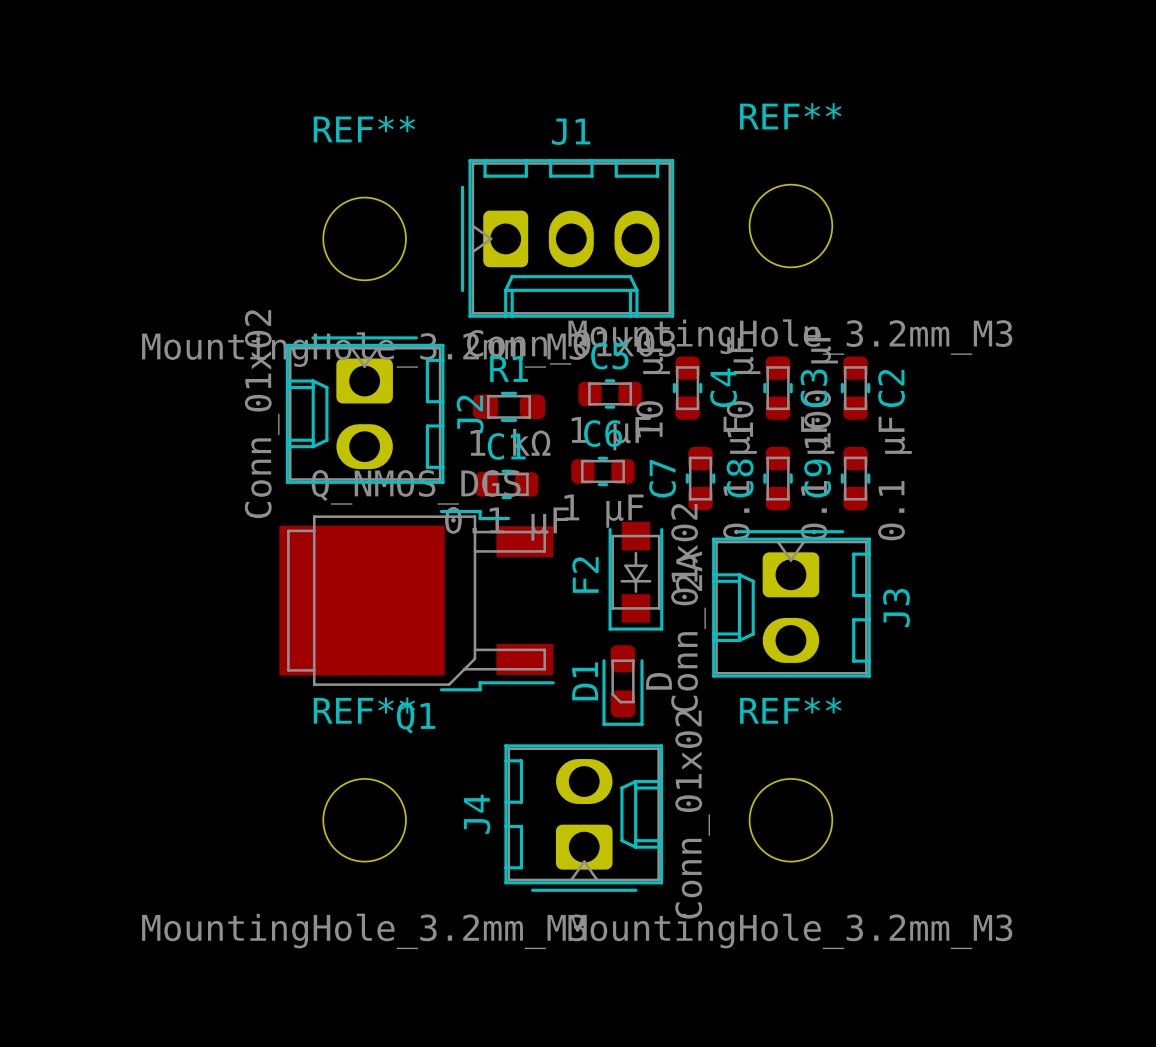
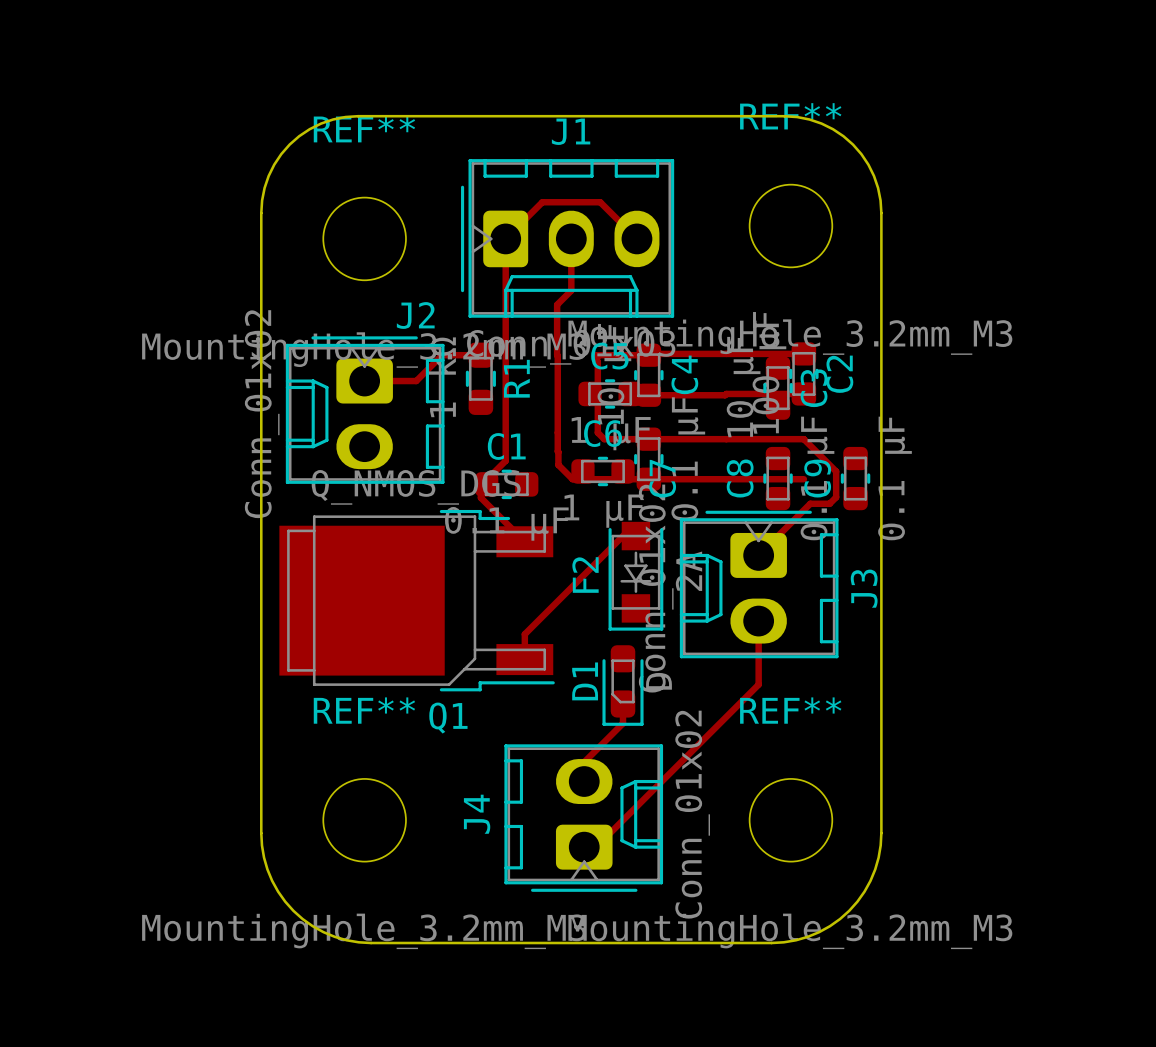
board edge: none -> (358, 116) (797, 117) (821, 123) (843, 136) (861, 154) (868, 164) (878, 188) (881, 213) (881, 833) (875, 869) (864, 891) (849, 910) (829, 926) (796, 940) (771, 943) (358, 942) (334, 936) (312, 926) (293, 910) (278, 891) (264, 857) (261, 833) (262, 200) (264, 188) (274, 164) (281, 154) (299, 136) (309, 129) (333, 119) (358, 116)
top track: none -> (571, 238) (571, 290) (557, 304) (558, 465) (572, 479) (803, 479)
top track: none -> (636, 238) (600, 202) (542, 202) (505, 238) (505, 460) (480, 485) (480, 497) (524, 541) (526, 539)
top track: none -> (803, 353) (597, 355) (597, 432) (604, 439) (803, 439) (836, 471) (836, 497) (829, 503) (810, 503) (758, 555)
top track: none -> (480, 355) (442, 355) (416, 381) (364, 381)
C4 position: (687, 388) -> (648, 375)
C2 position: (855, 388) -> (803, 373)
top track: none -> (803, 393) (648, 395)
R1 rotation: 0° (509, 406) -> 90° clockwise (480, 378)
J2 name rotation: 0° (470, 414) -> 90° clockwise (415, 315)
J2 name position: J2 (470, 414) -> J2 (415, 315)
C7 position: (700, 478) -> (648, 459)
top track: none -> (629, 529) (524, 634) (524, 659)
J3 position: (791, 603) -> (759, 584)
top track: none -> (758, 621) (758, 684) (596, 847) (584, 847) (584, 840)
top track: none -> (623, 704) (623, 723) (584, 762) (584, 781)
Q1 name position: Q1 (416, 718) -> Q1 (448, 718)

